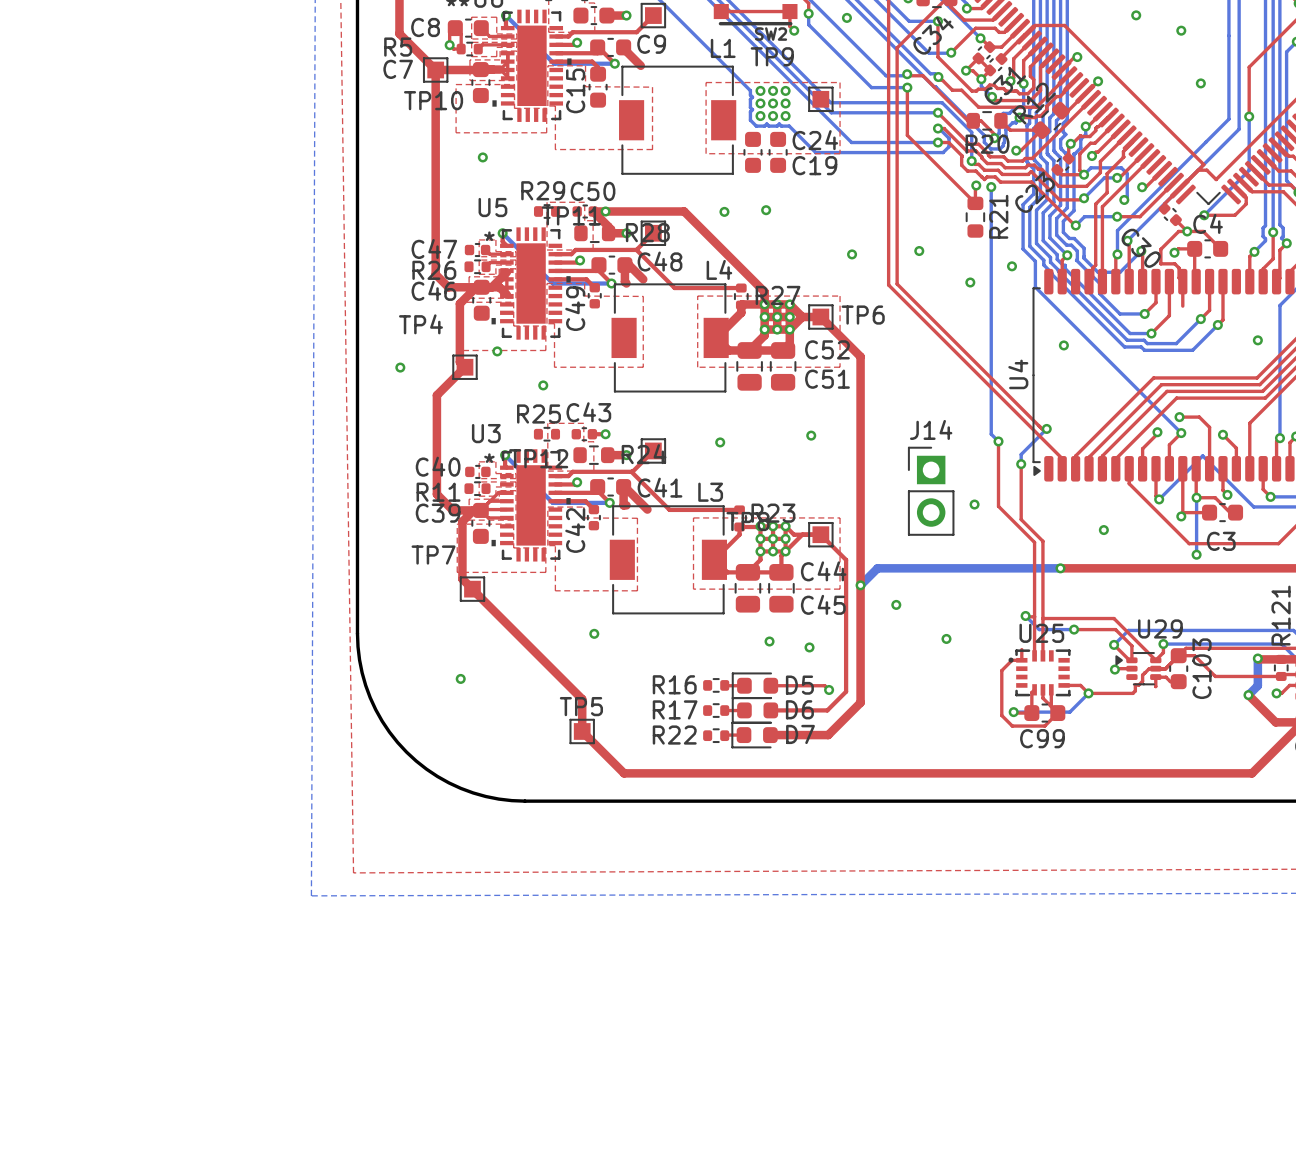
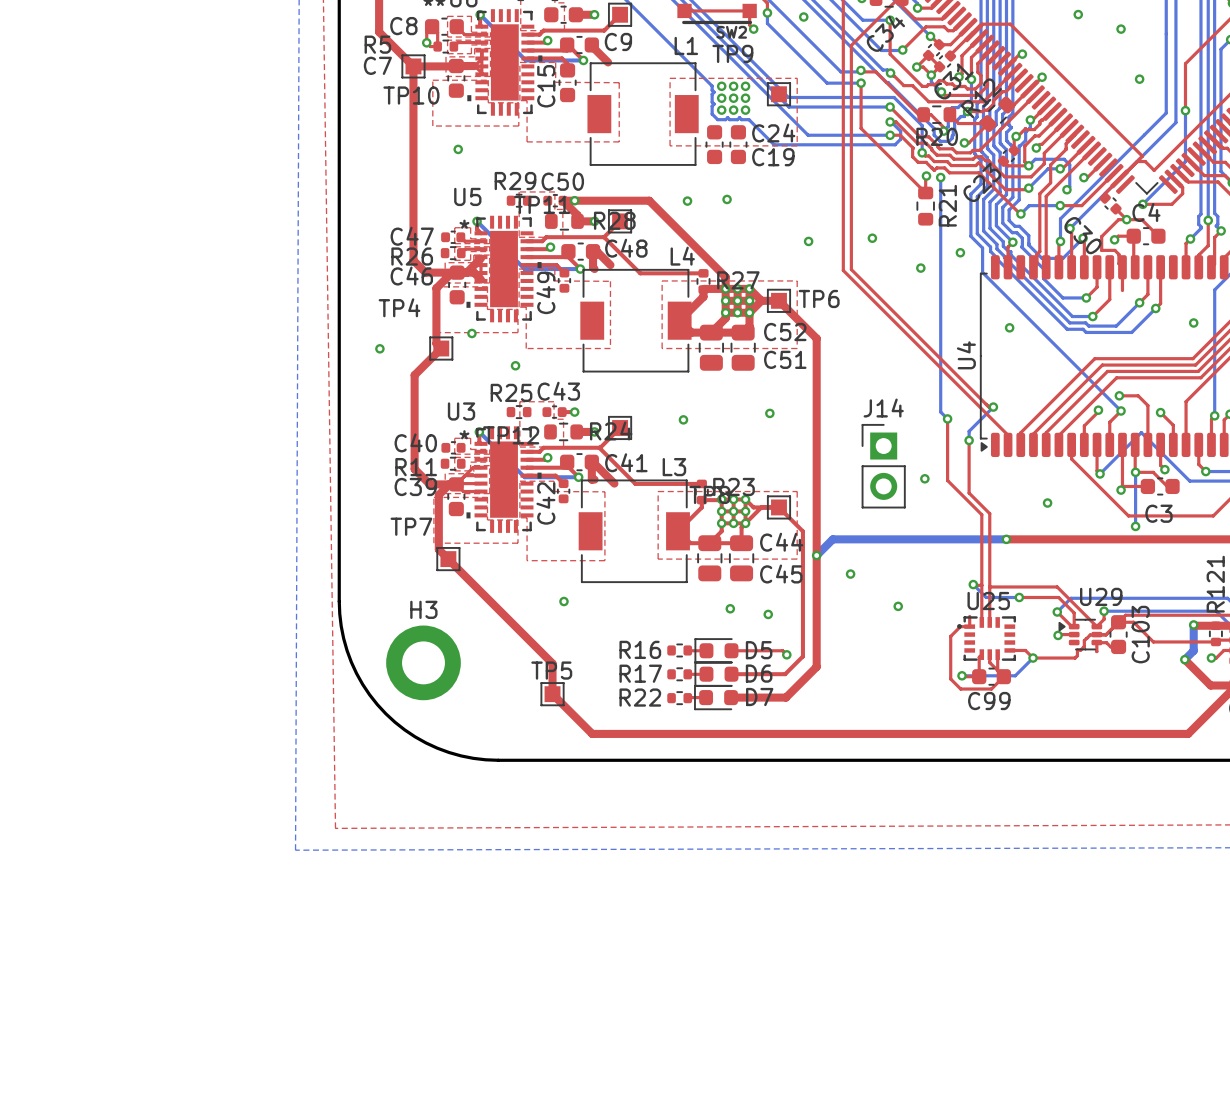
via: (460, 678) -> none
H3: none -> (423, 662)

